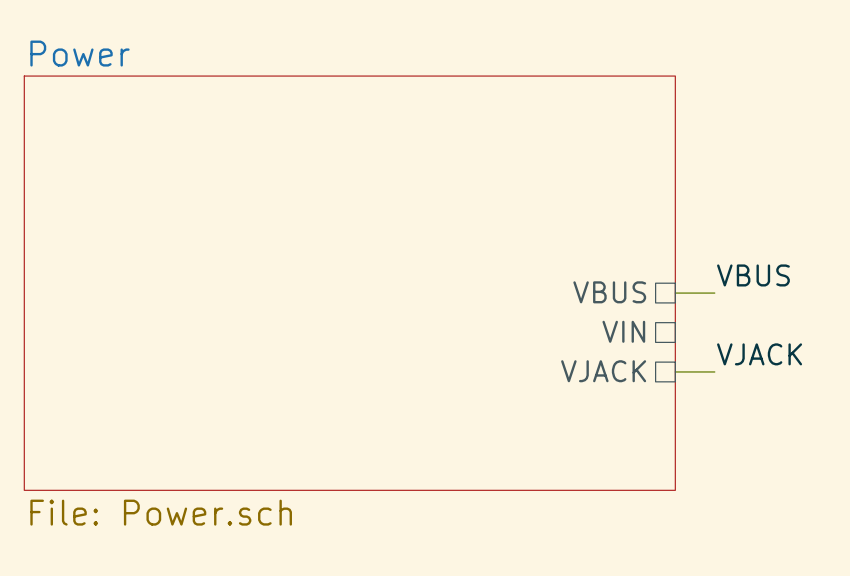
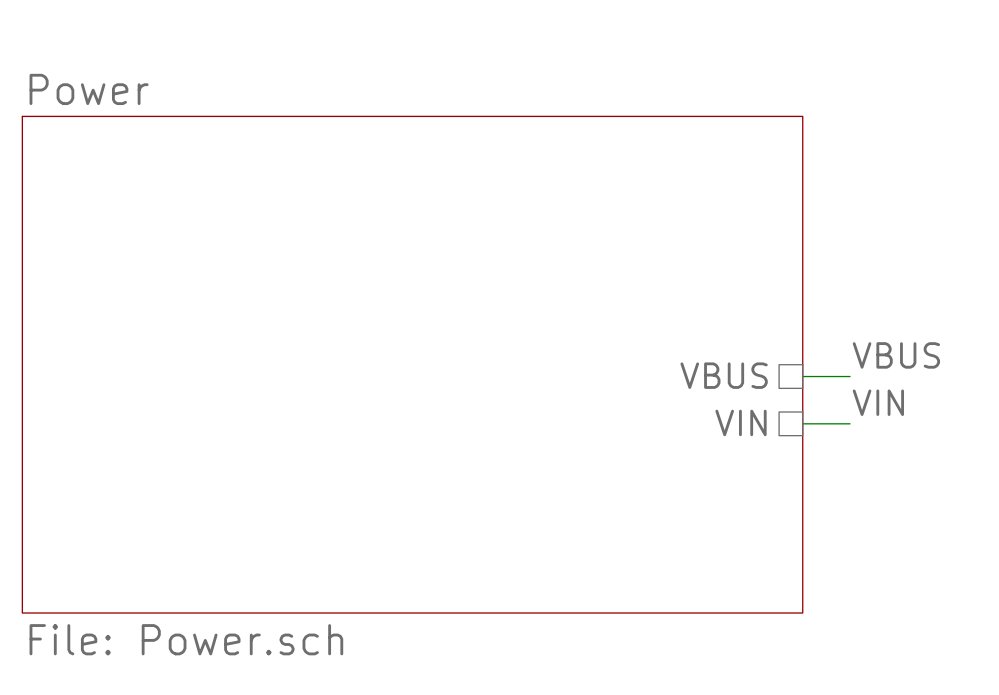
label: none -> VIN (878, 402)
label: VJACK (759, 354) -> none
sheet pin: VJACK (603, 371) -> none
wire: (675, 371) (714, 371) -> (802, 423) (850, 423)

